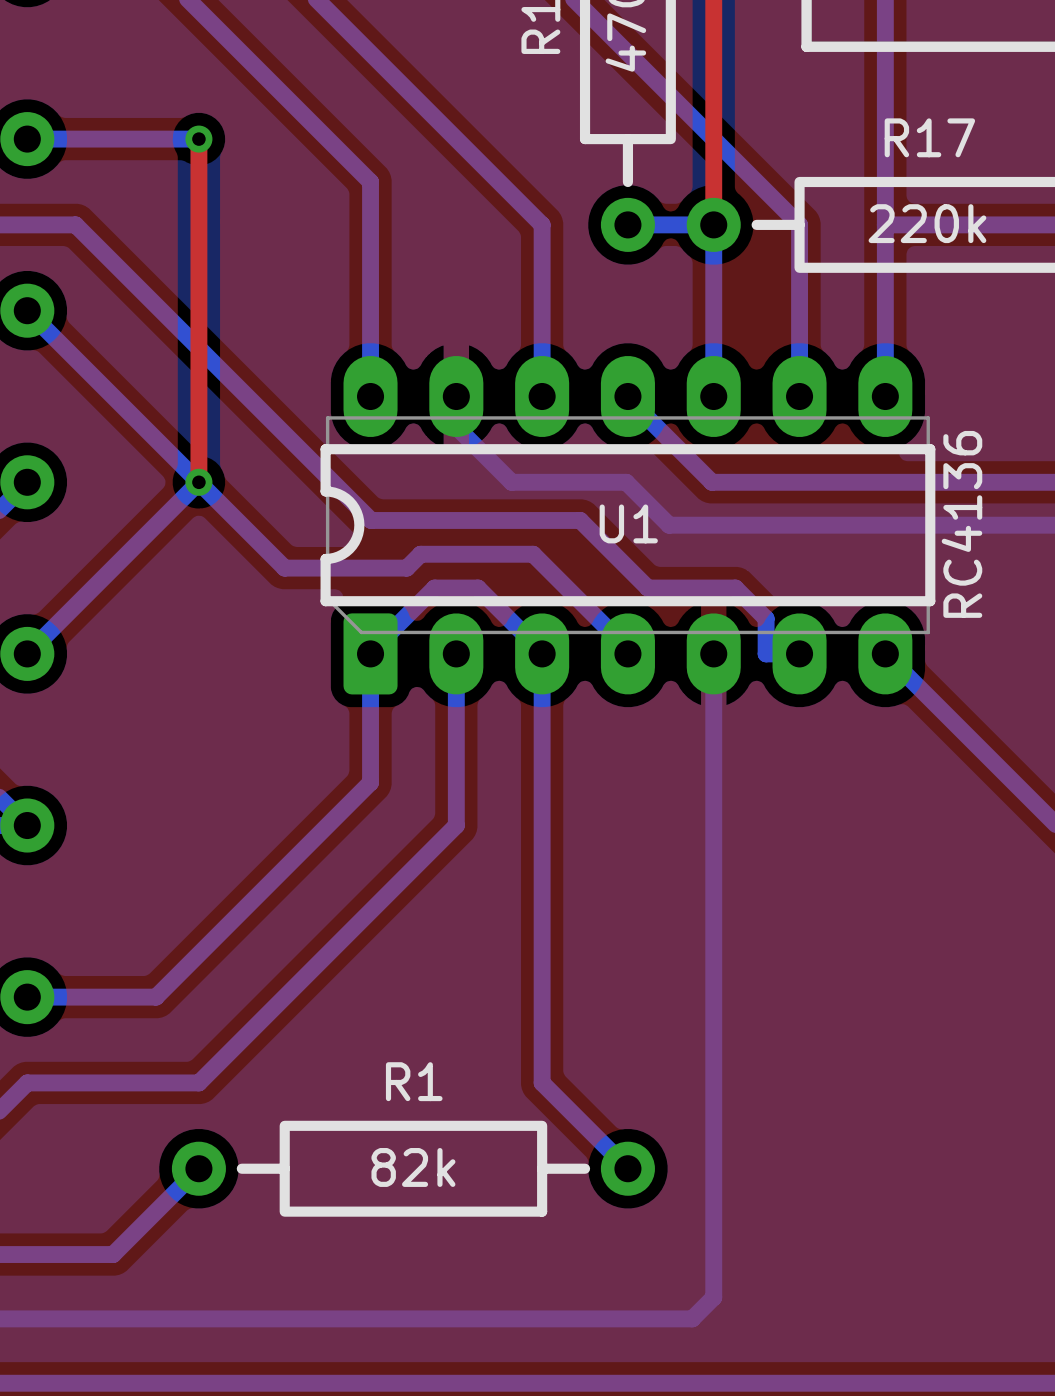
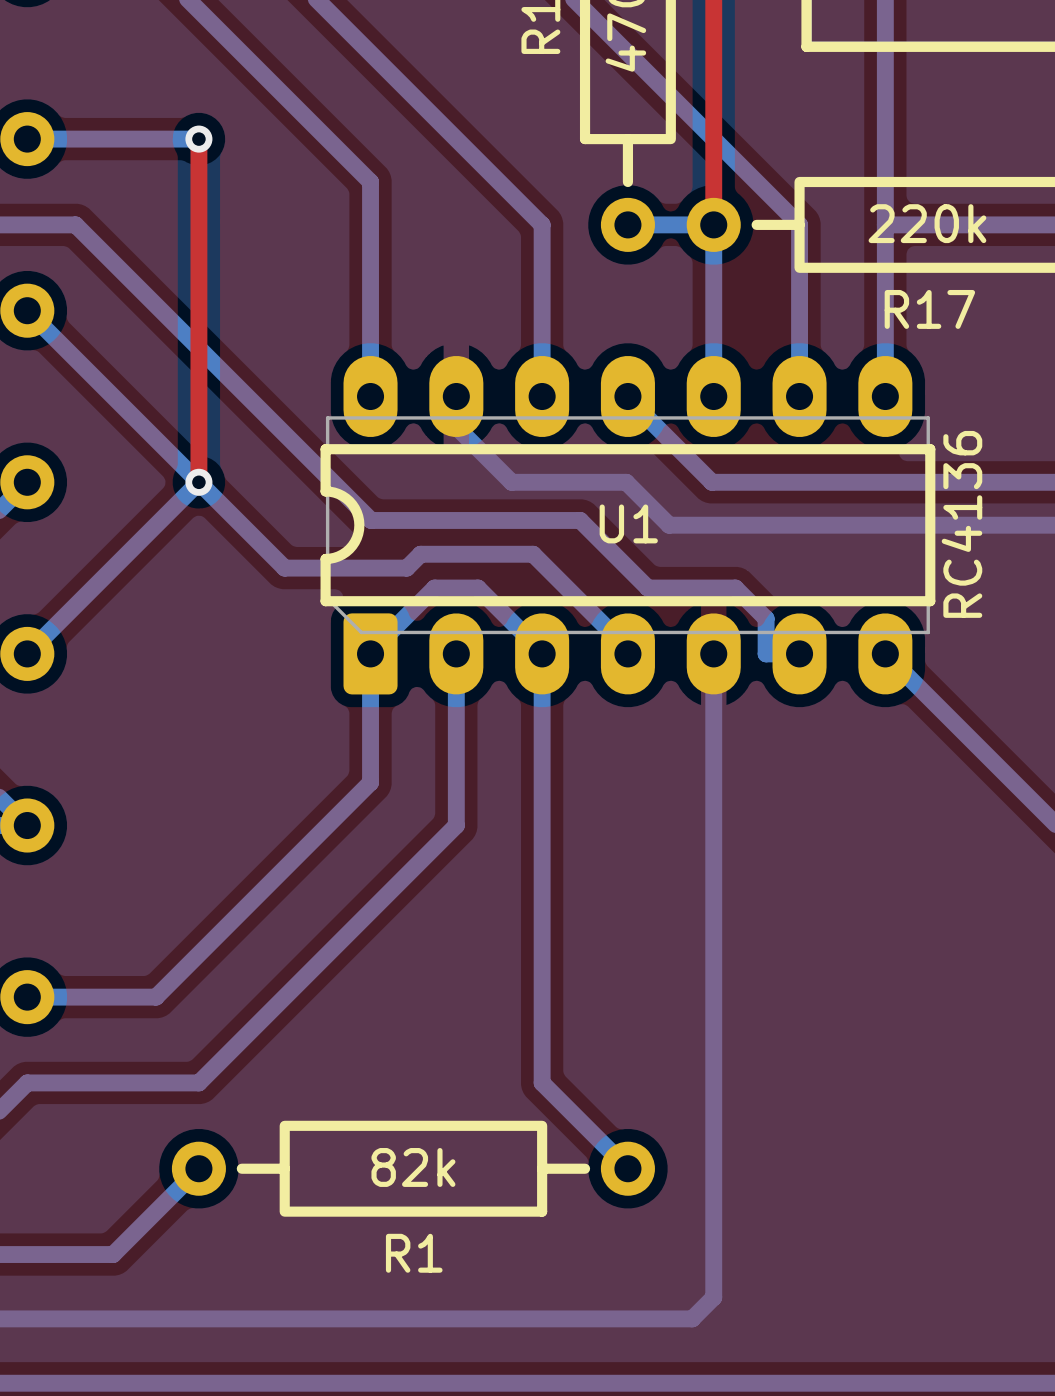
R17 name position: R17 (929, 137) -> R17 (929, 309)
R1 name position: R1 (414, 1081) -> R1 (414, 1253)

